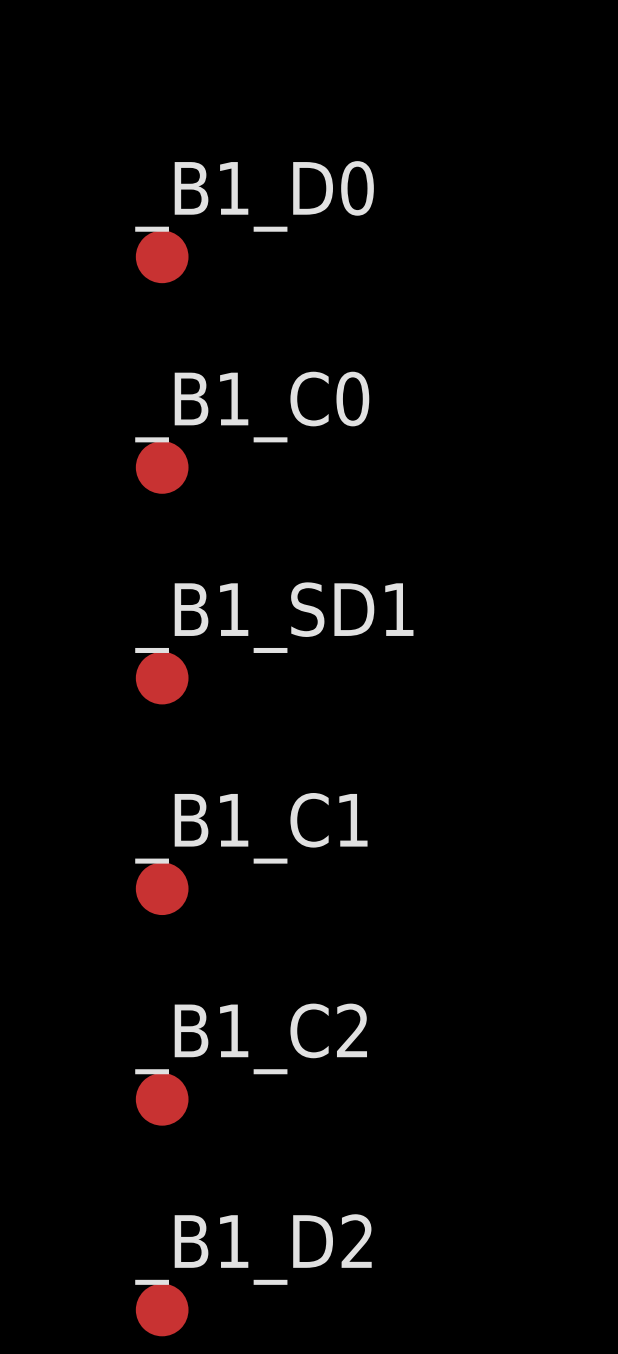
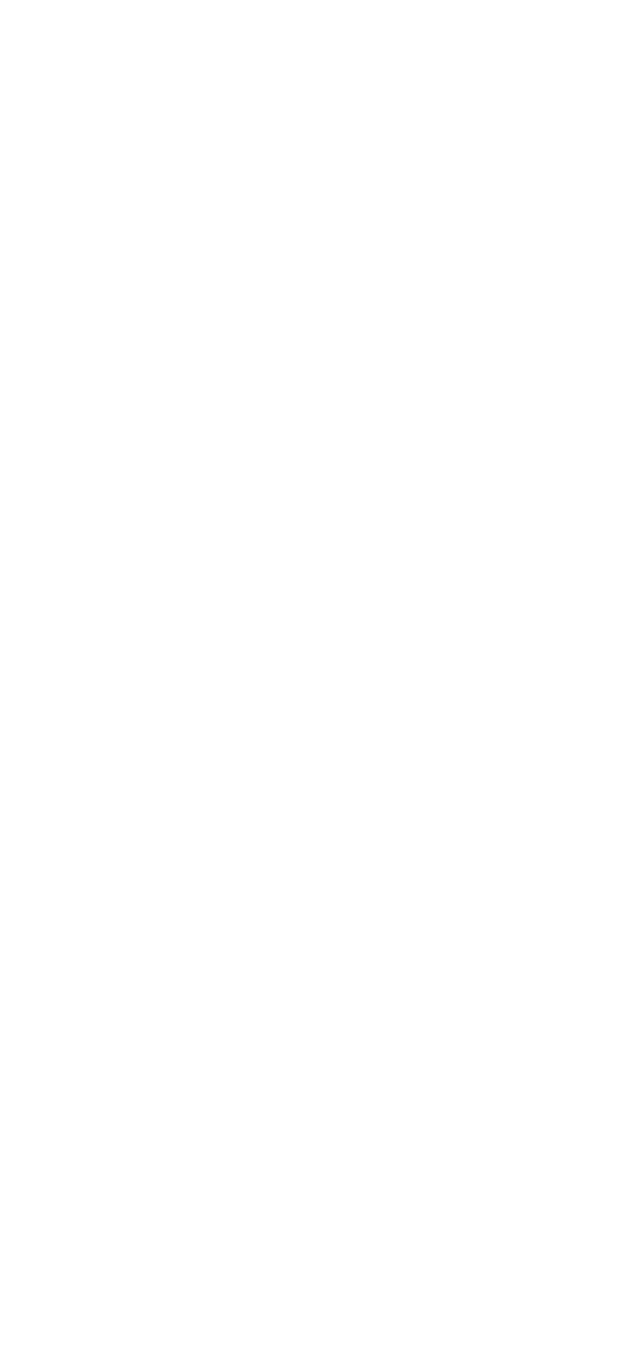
_B1_D0: (162, 256) -> none
_B1_C0: (162, 467) -> none
_B1_SD1: (162, 678) -> none
_B1_C1: (162, 888) -> none
_B1_C2: (162, 1099) -> none
_B1_D2: (162, 1309) -> none

